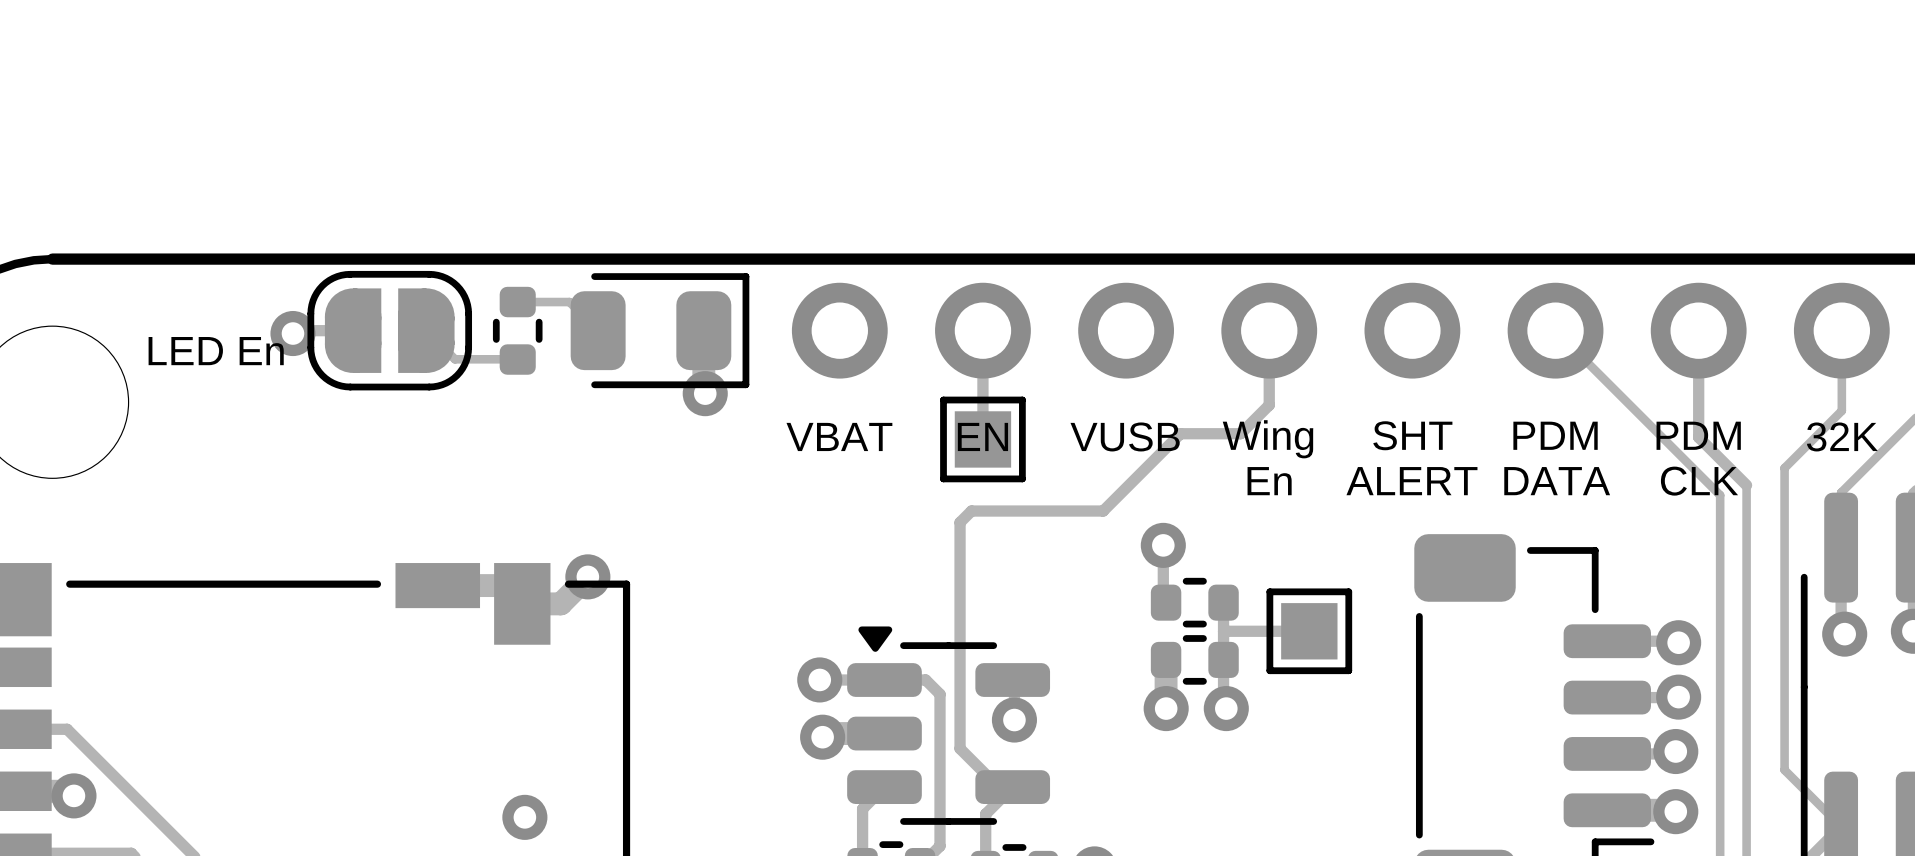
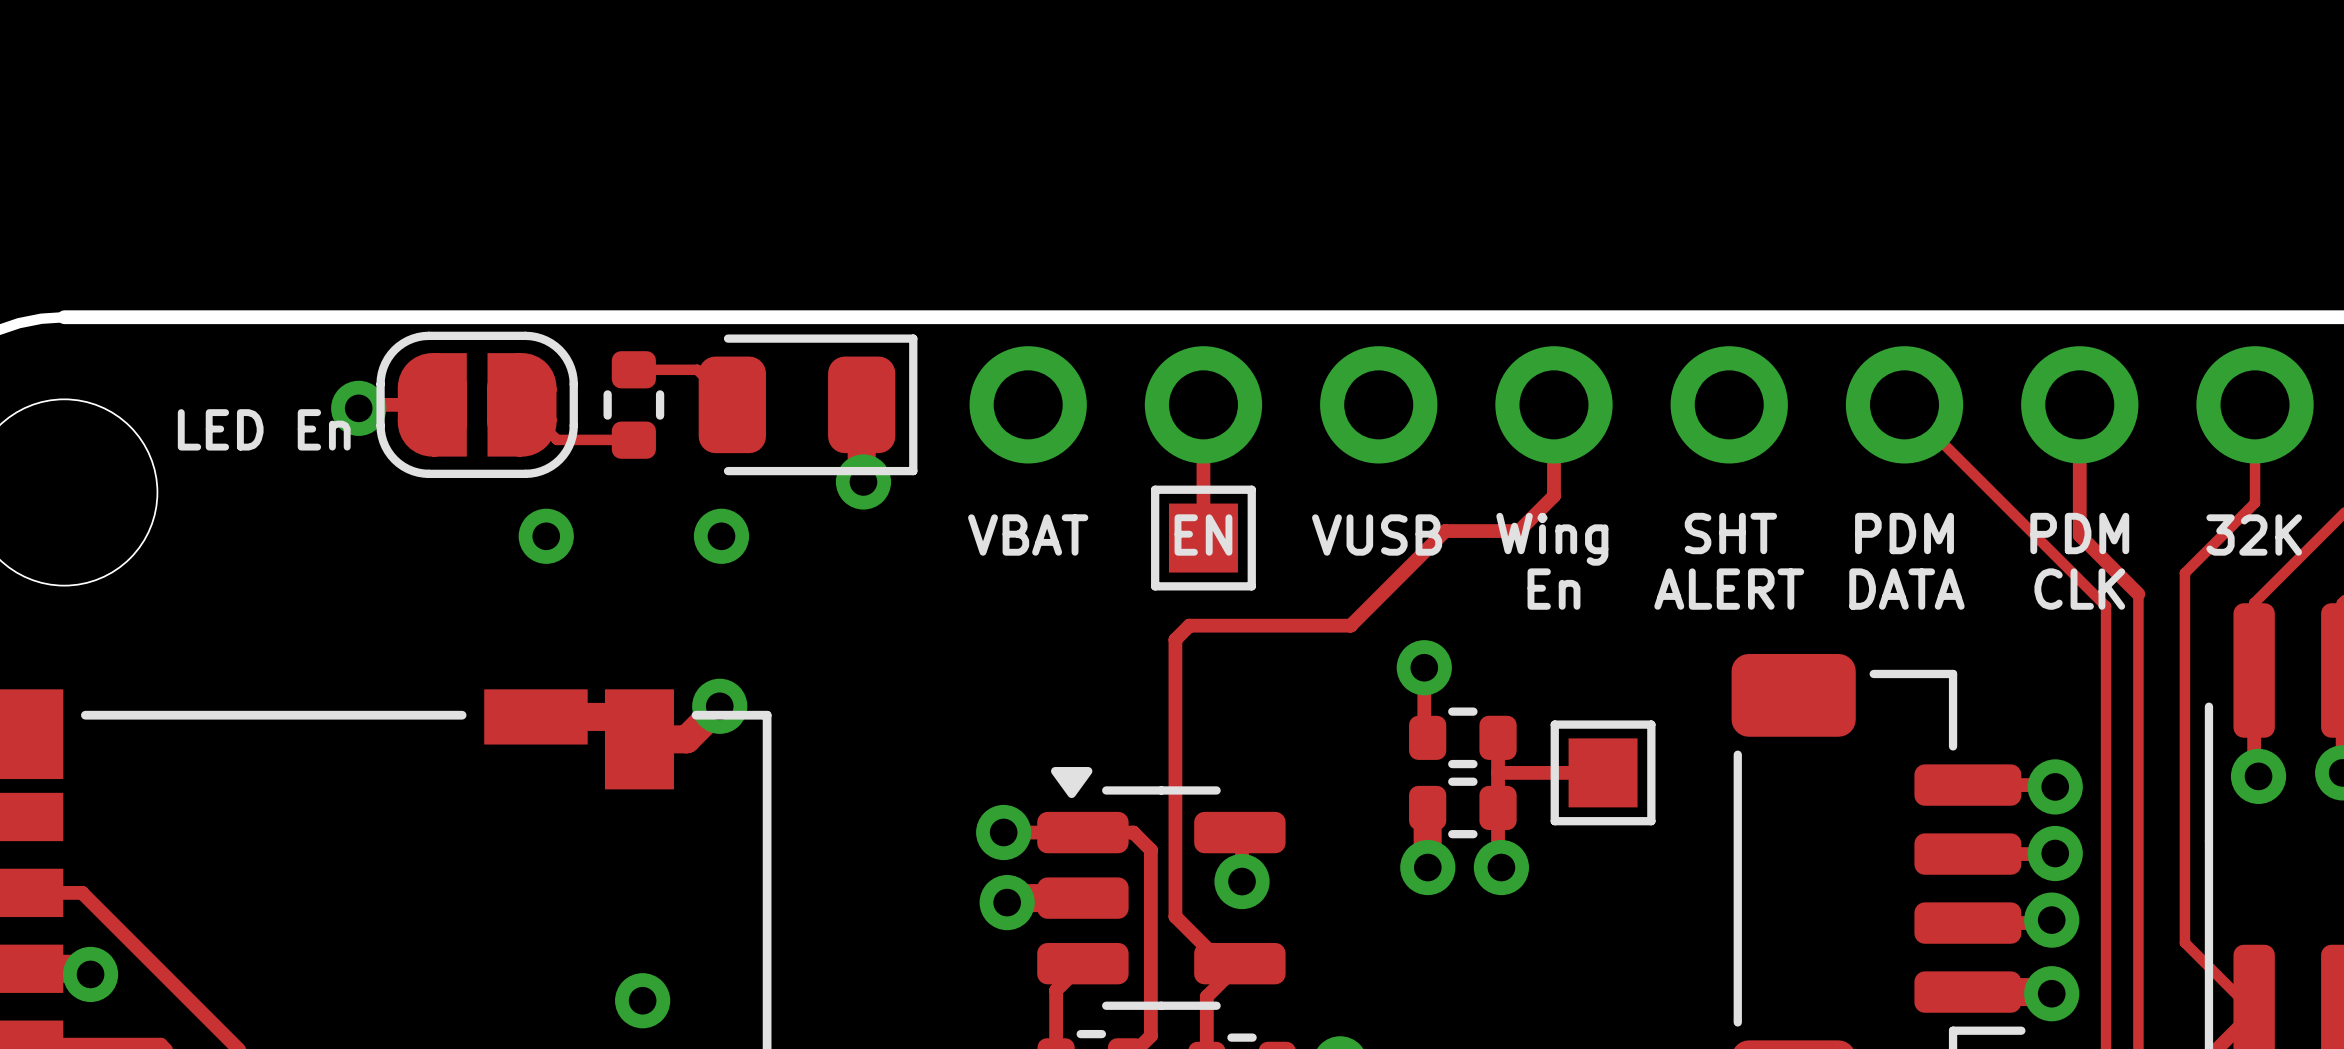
via: none -> (546, 536)
via: none -> (721, 536)

